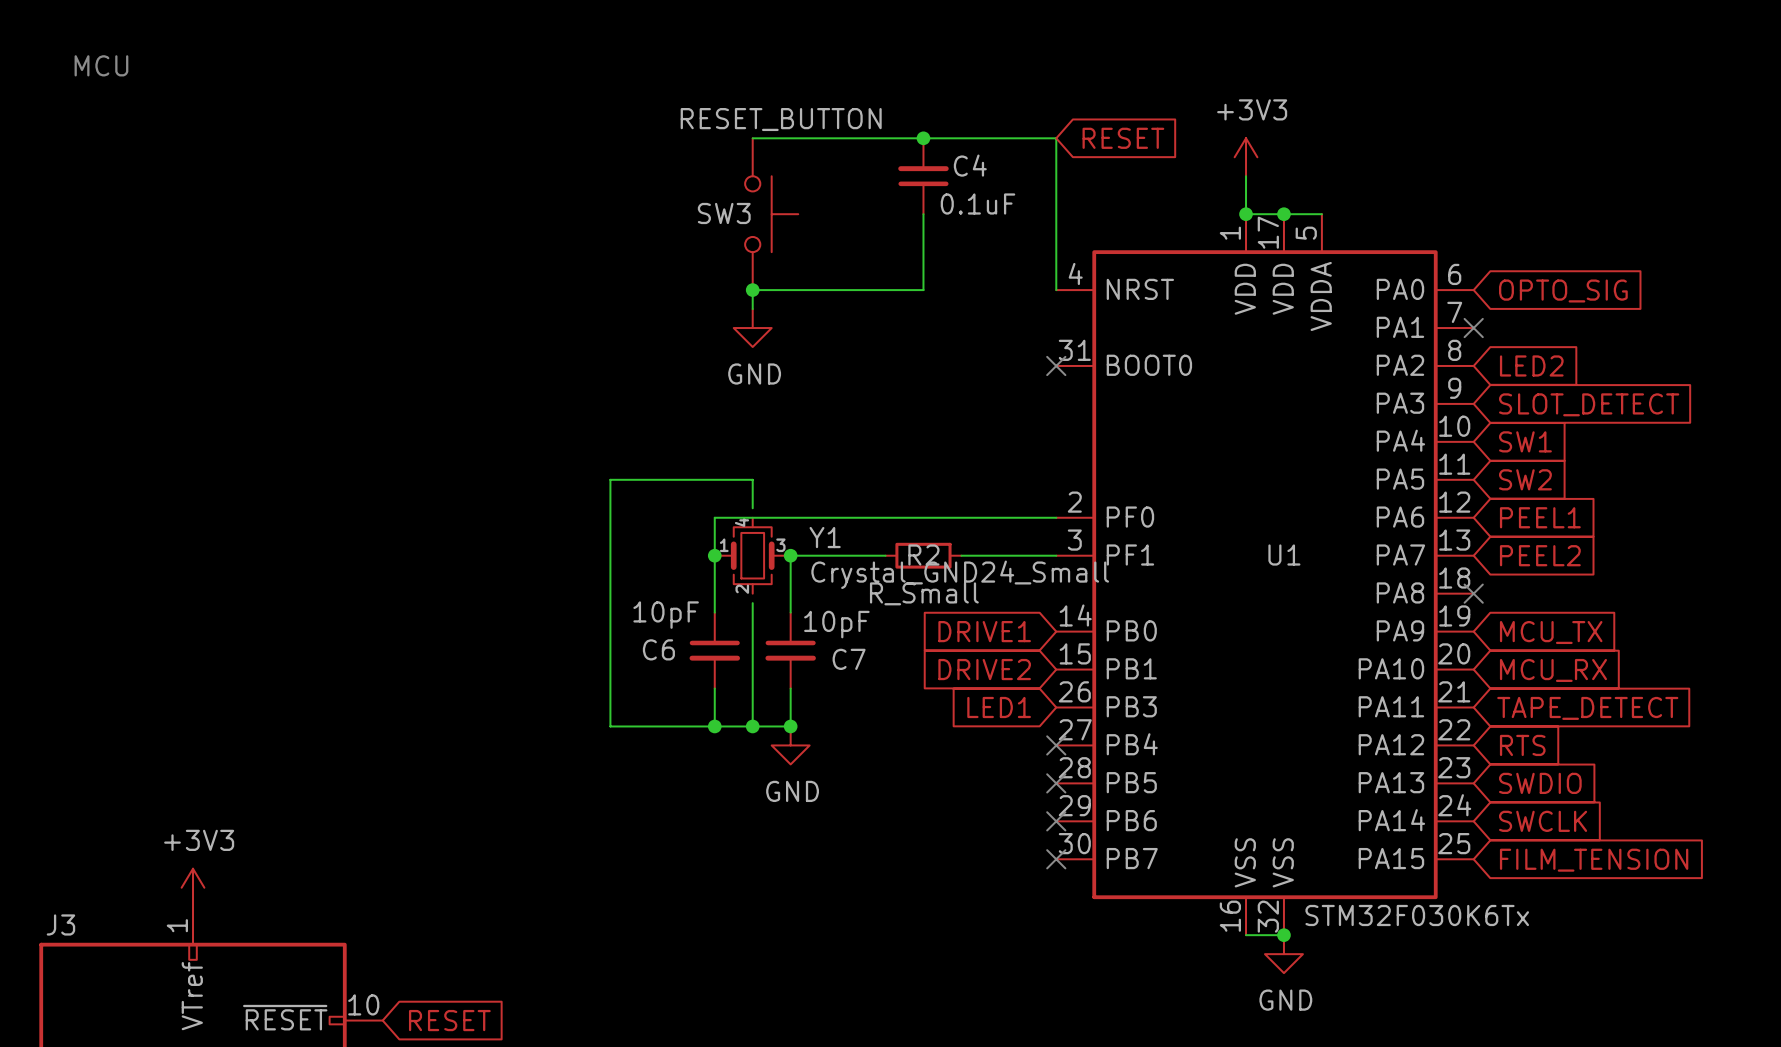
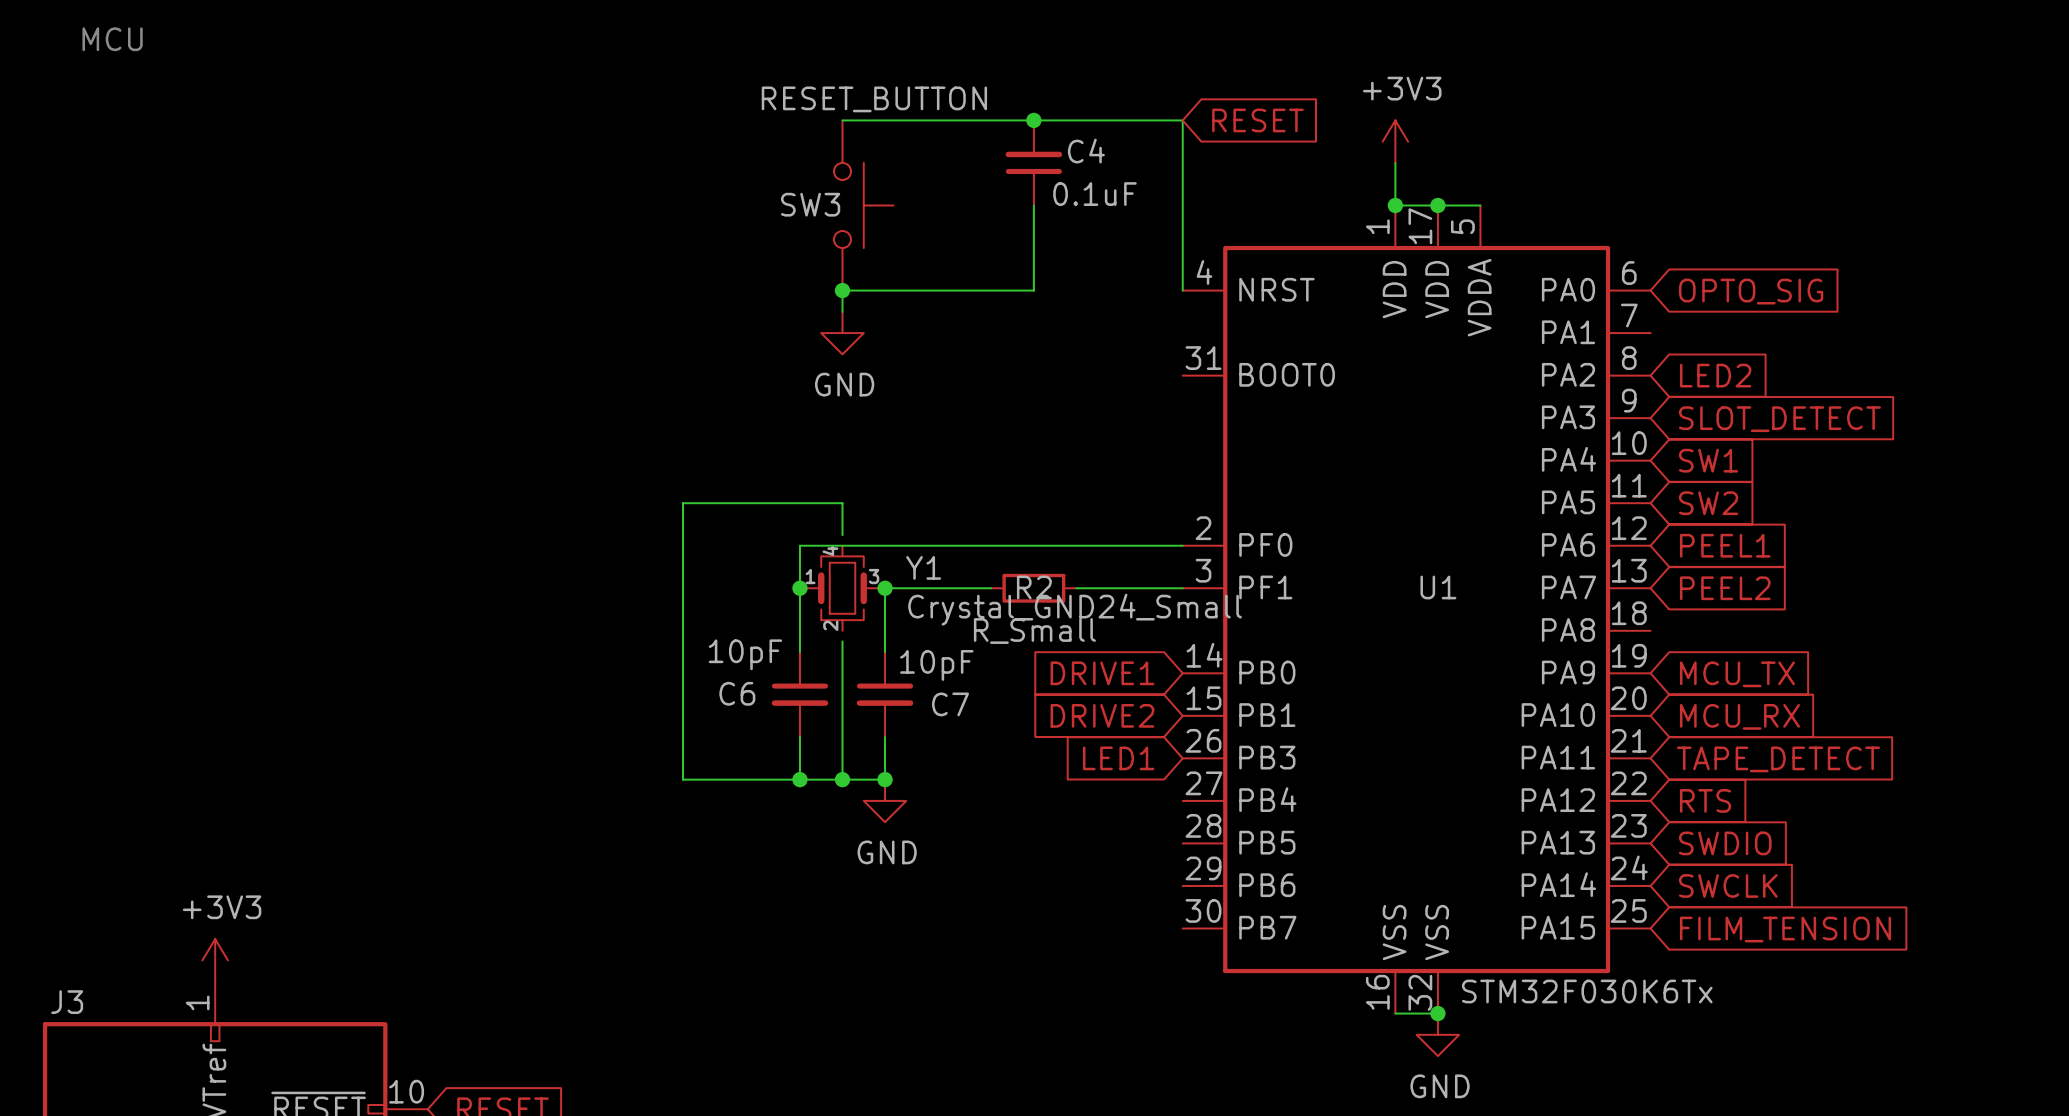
no-connect mark: (1473, 328) -> none
no-connect mark: (1056, 365) -> none
no-connect mark: (1473, 593) -> none
no-connect mark: (1056, 745) -> none
no-connect mark: (1056, 783) -> none
no-connect mark: (1056, 821) -> none
no-connect mark: (1056, 859) -> none

